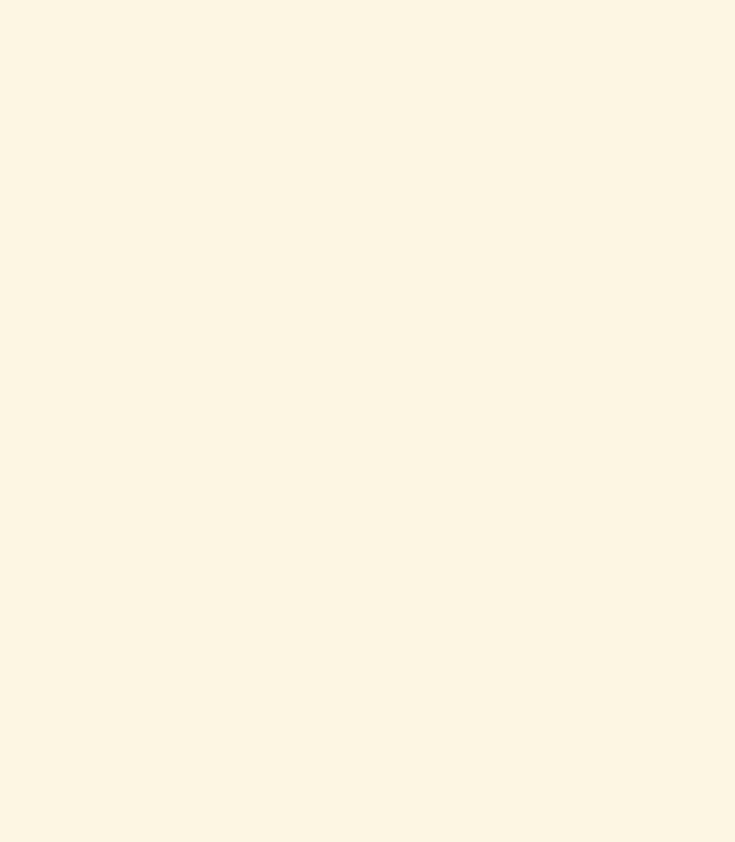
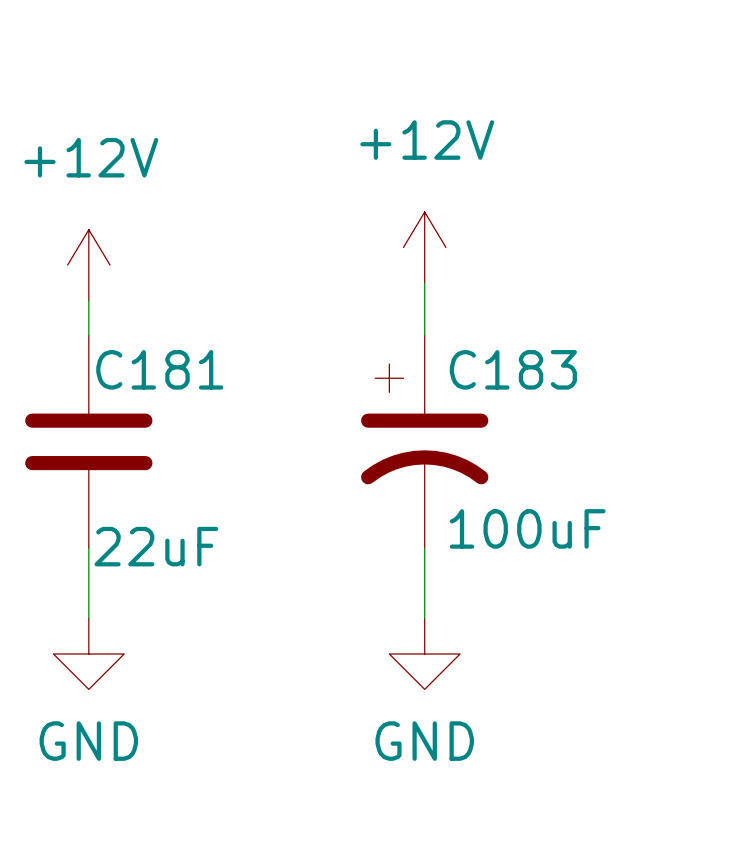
power symbol: none -> +12V (424, 247)
power symbol: none -> +12V (88, 265)
wire: none -> (424, 282) (424, 335)
wire: none -> (88, 300) (88, 335)
C181: none -> 22uF (88, 441)
C183: none -> 100uF (424, 441)
wire: none -> (88, 547) (88, 618)
wire: none -> (424, 547) (424, 618)
power symbol: none -> GND (88, 654)
power symbol: none -> GND (424, 654)

